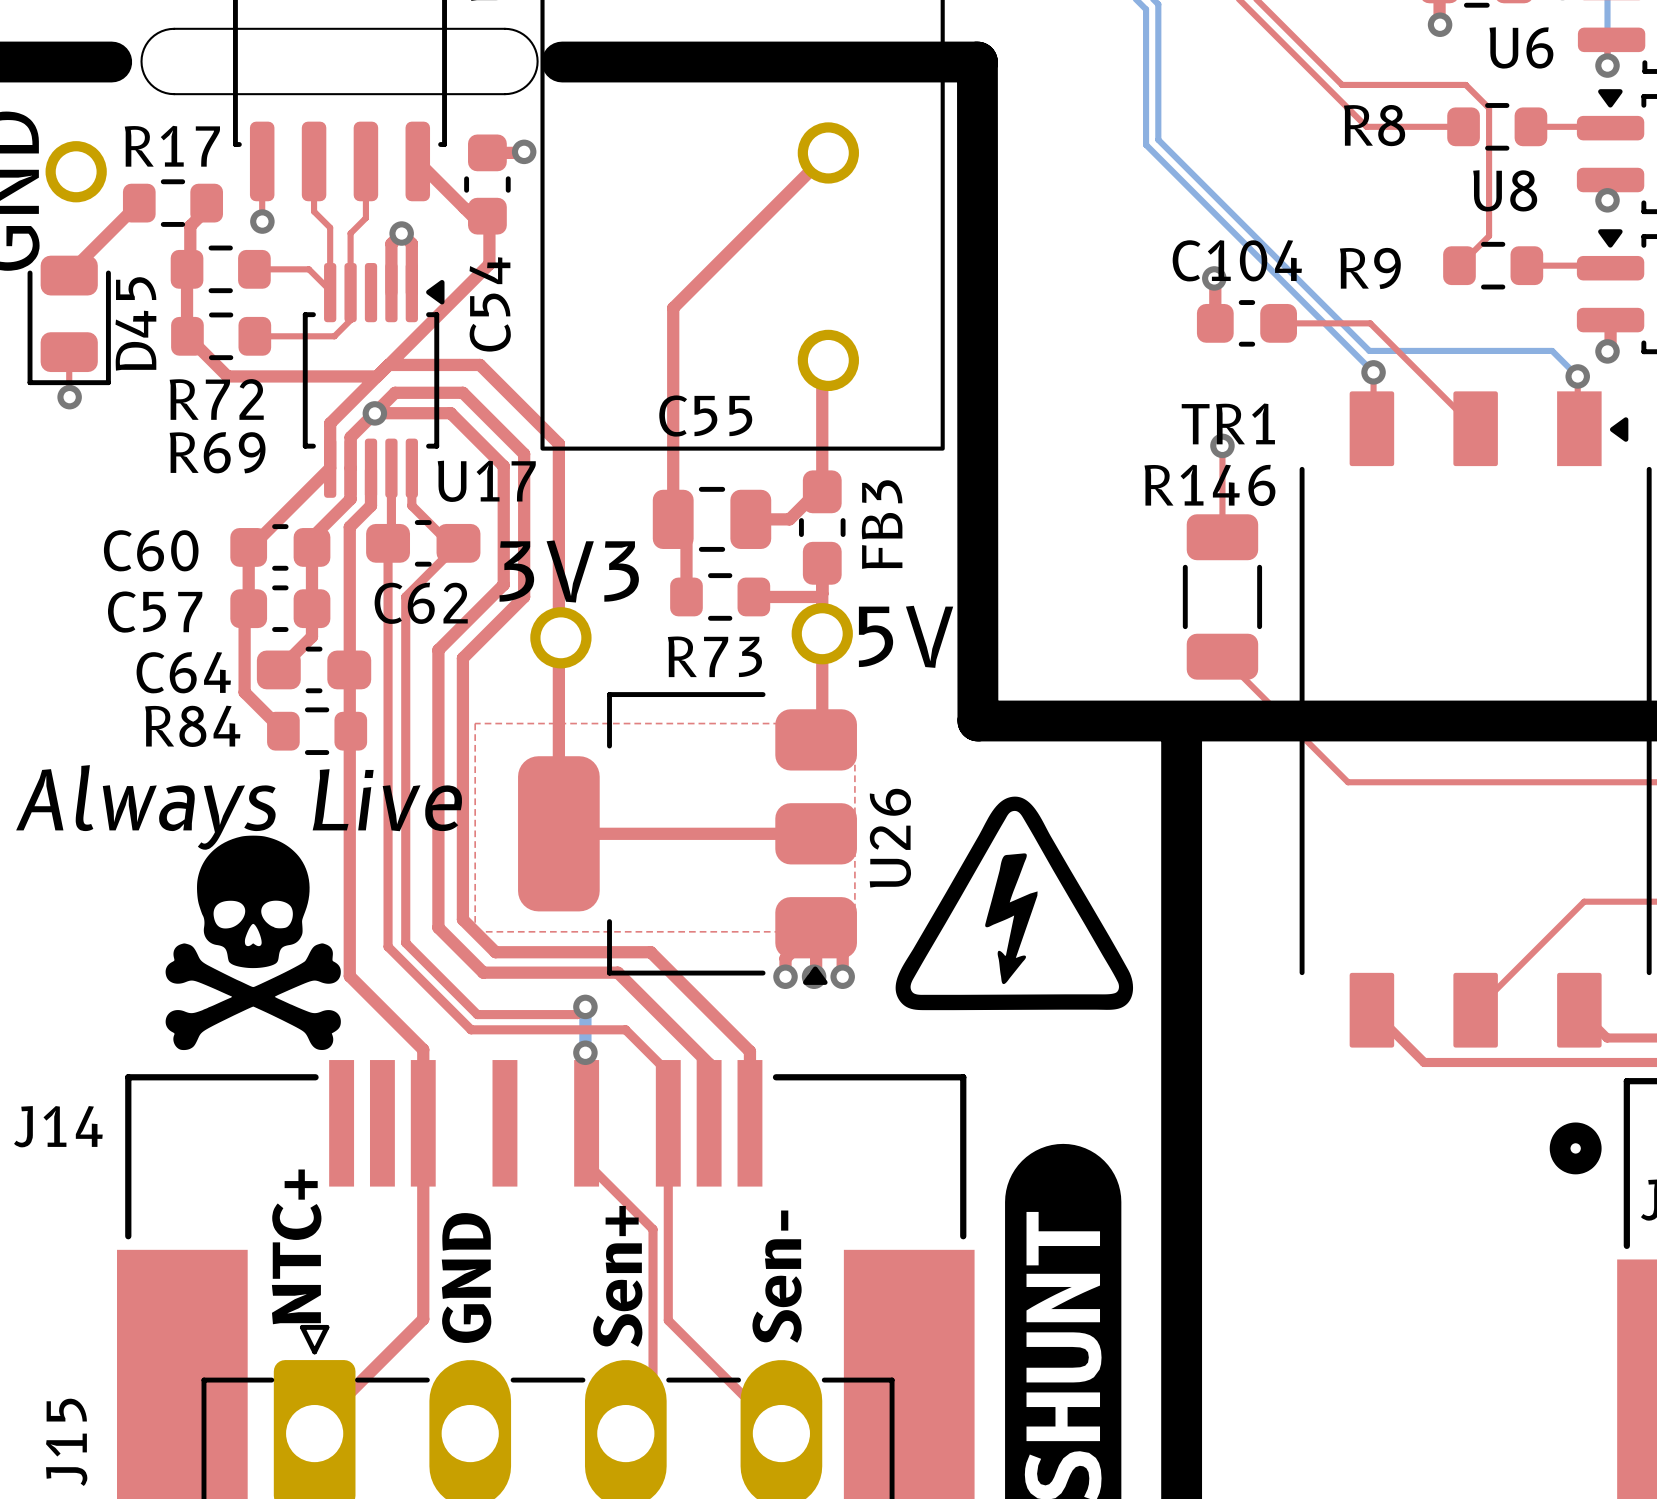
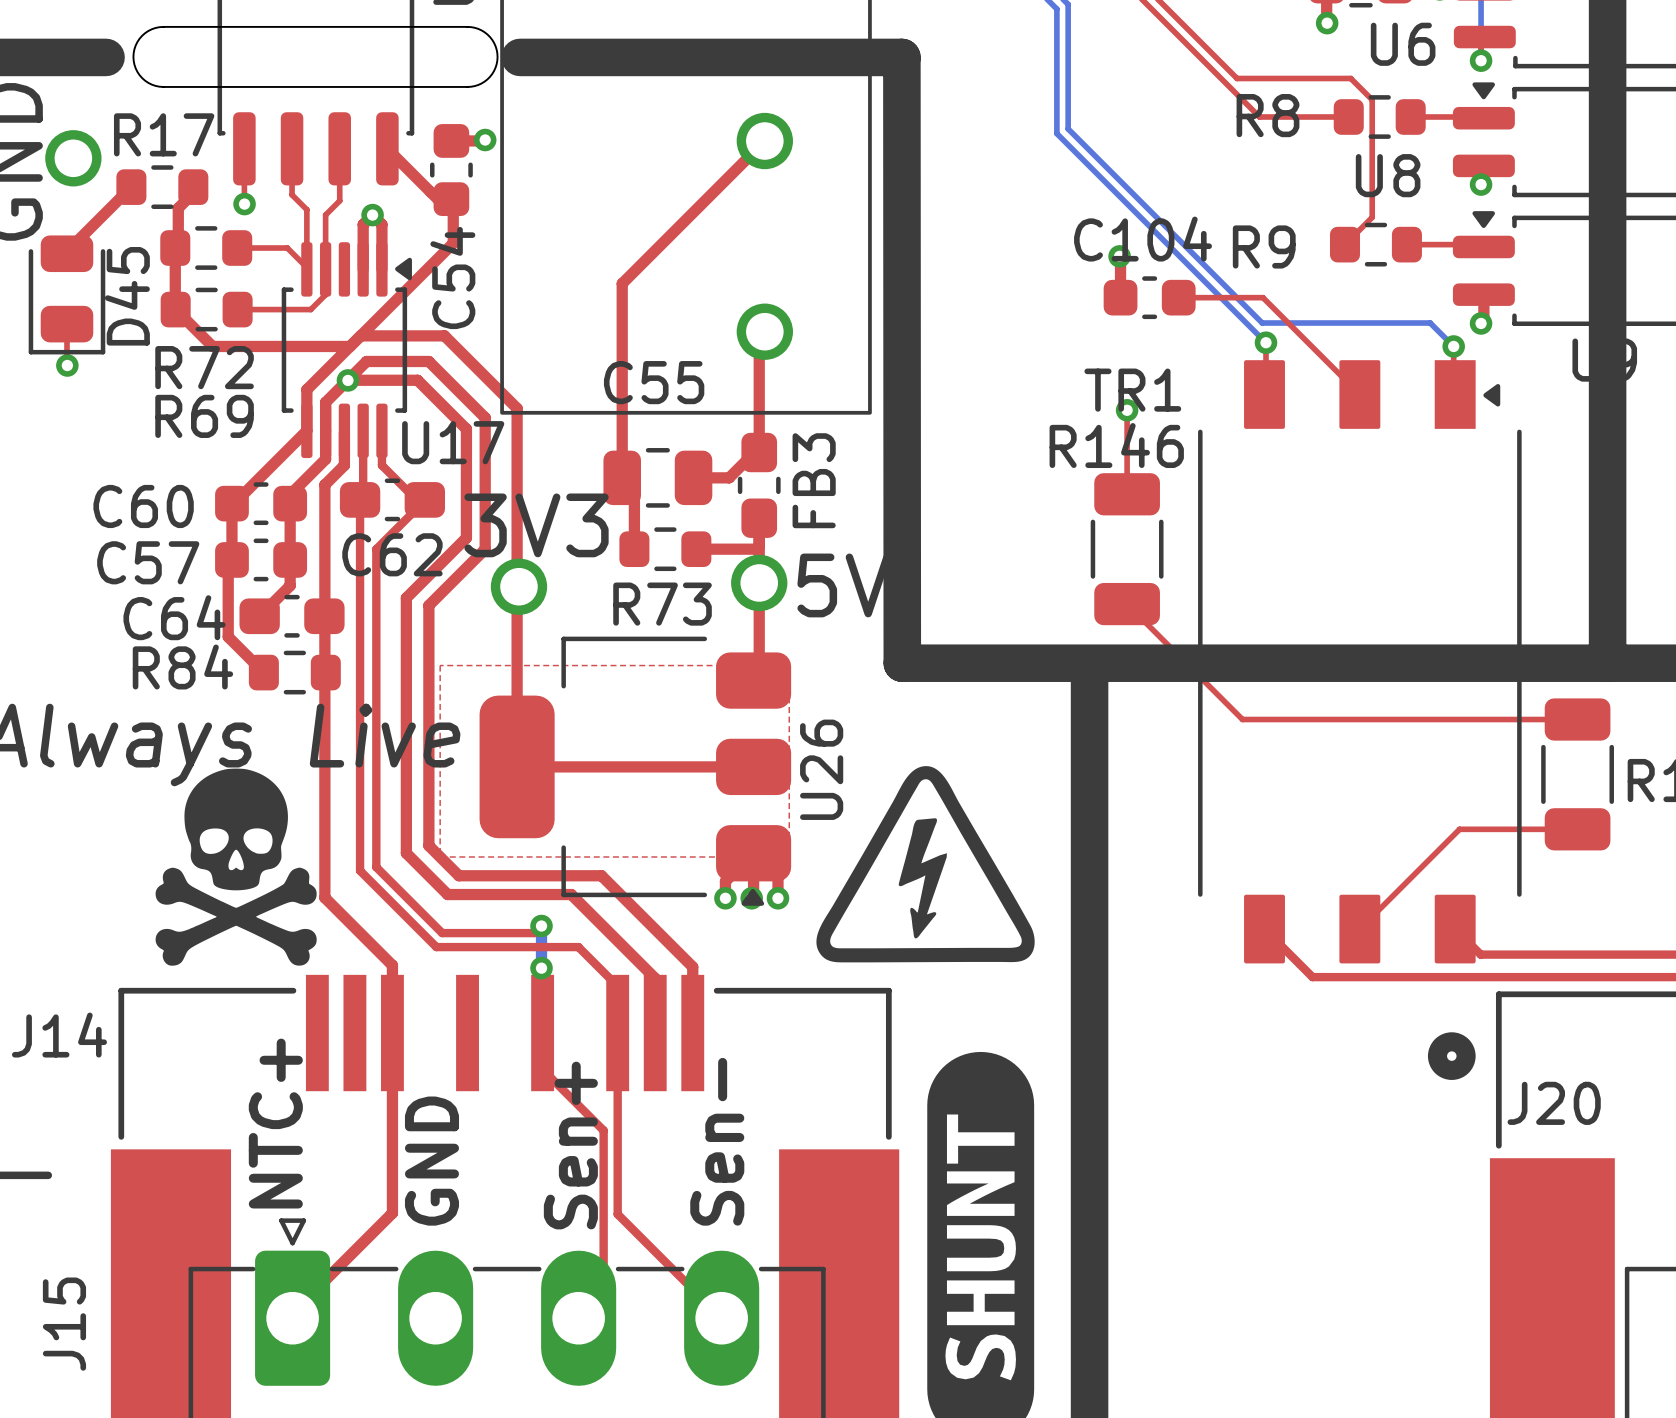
drawing position: (1014, 903) -> (925, 864)
drawing position: (1011, 918) -> (922, 878)

